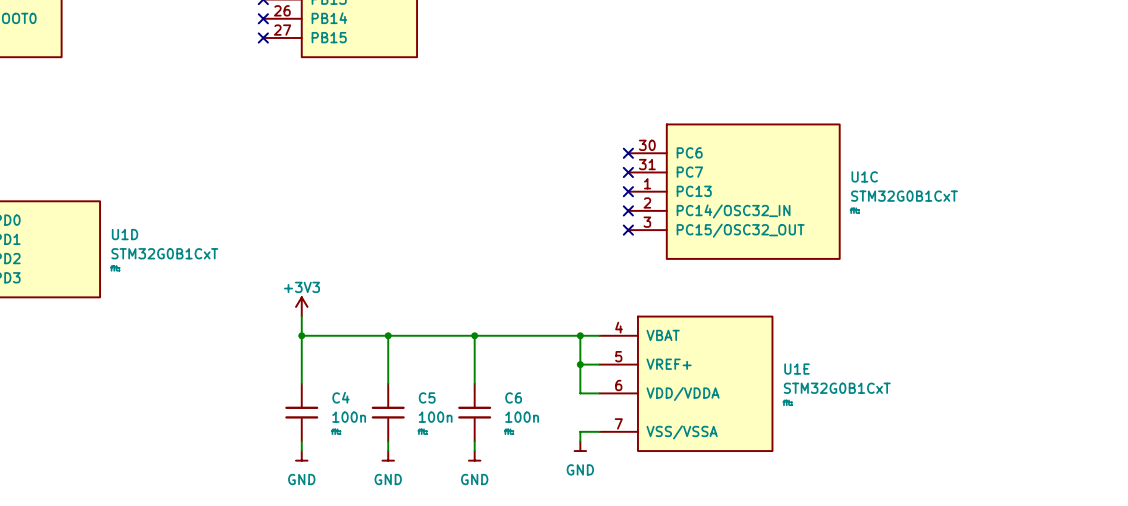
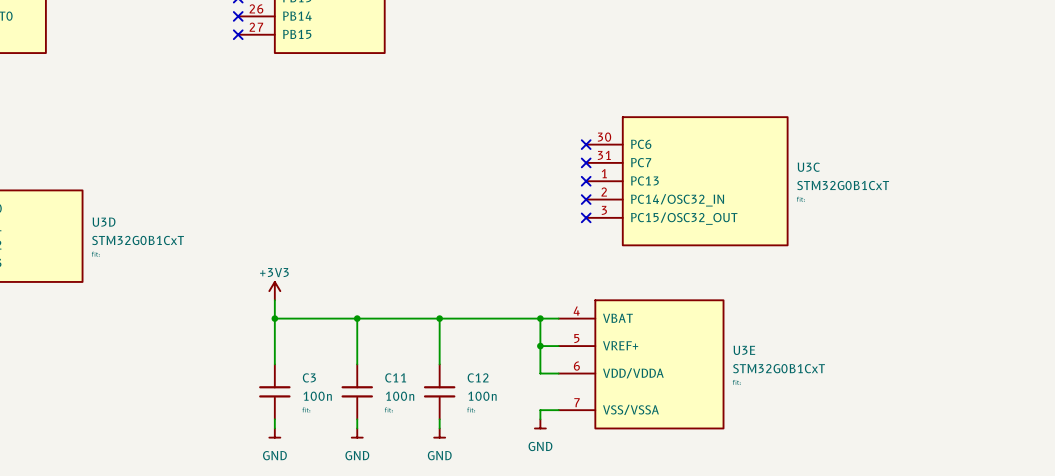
U1C name: U1C (864, 176) -> U3C (808, 167)
U1D name: U1D (125, 234) -> U3D (104, 222)
U1E name: U1E (797, 369) -> U3E (744, 350)
C4 name: C4 (340, 397) -> C3 (309, 377)
C5 name: C5 (427, 397) -> C11 (395, 377)
C6 name: C6 (513, 397) -> C12 (478, 377)

